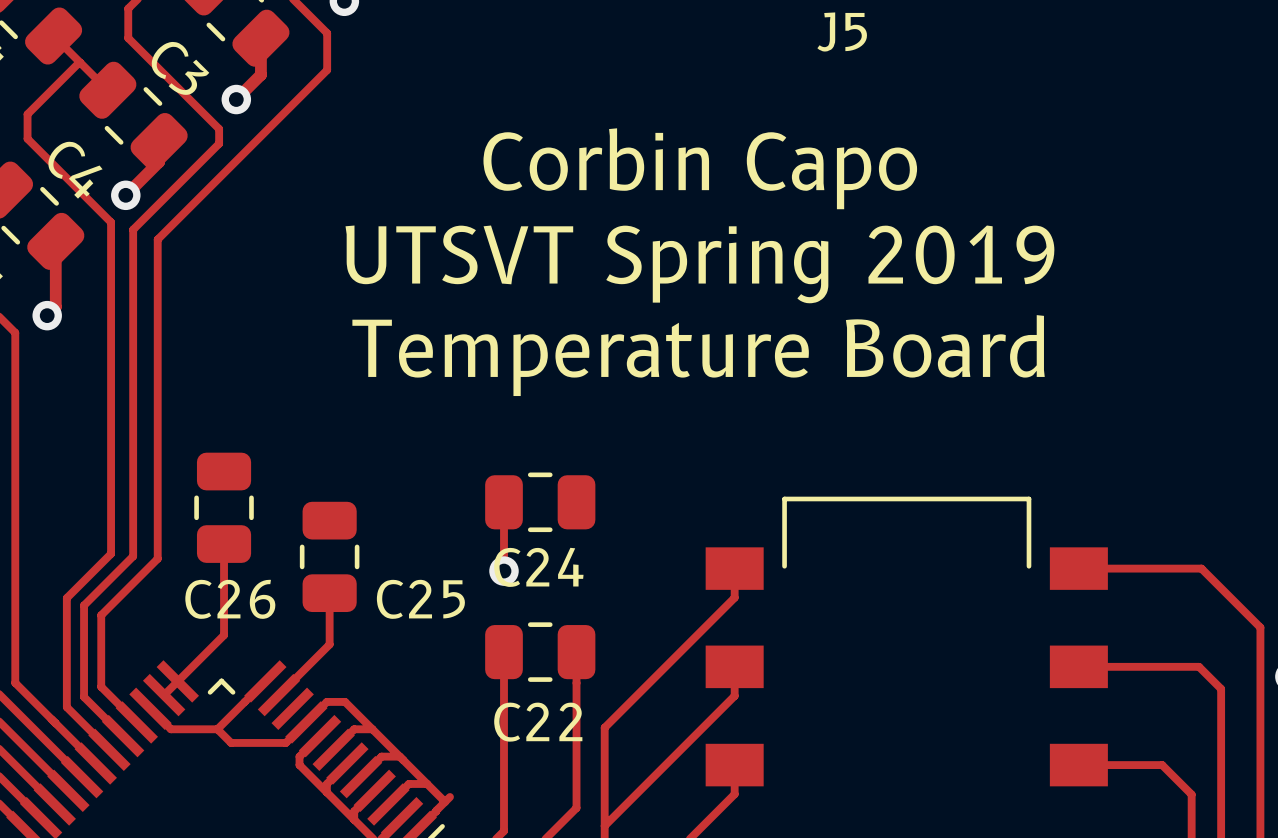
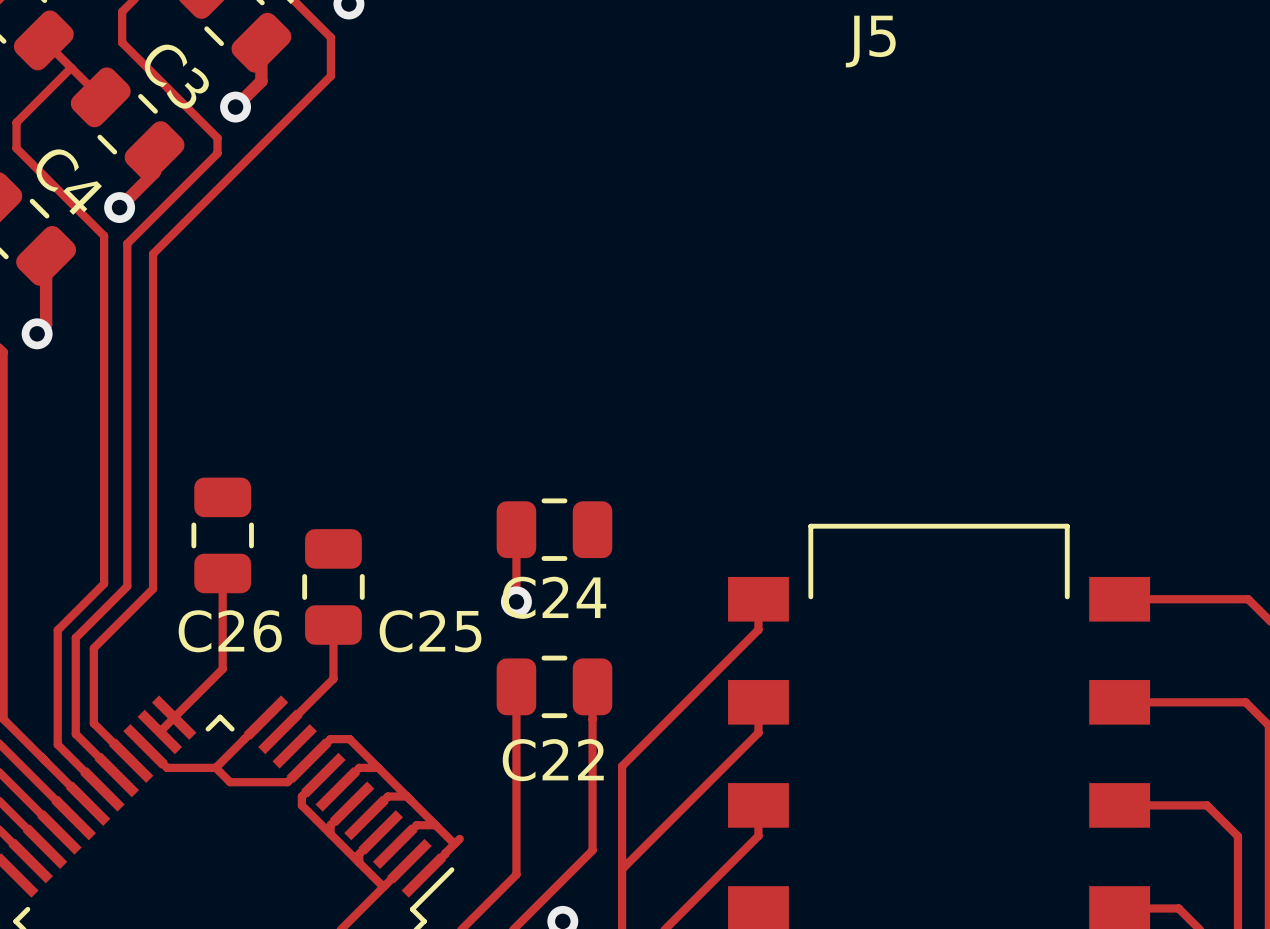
text: Corbin Capo (700, 168) -> none
text: UTSVT Spring 2019 (699, 264) -> none
text: Temperature Board (698, 355) -> none

